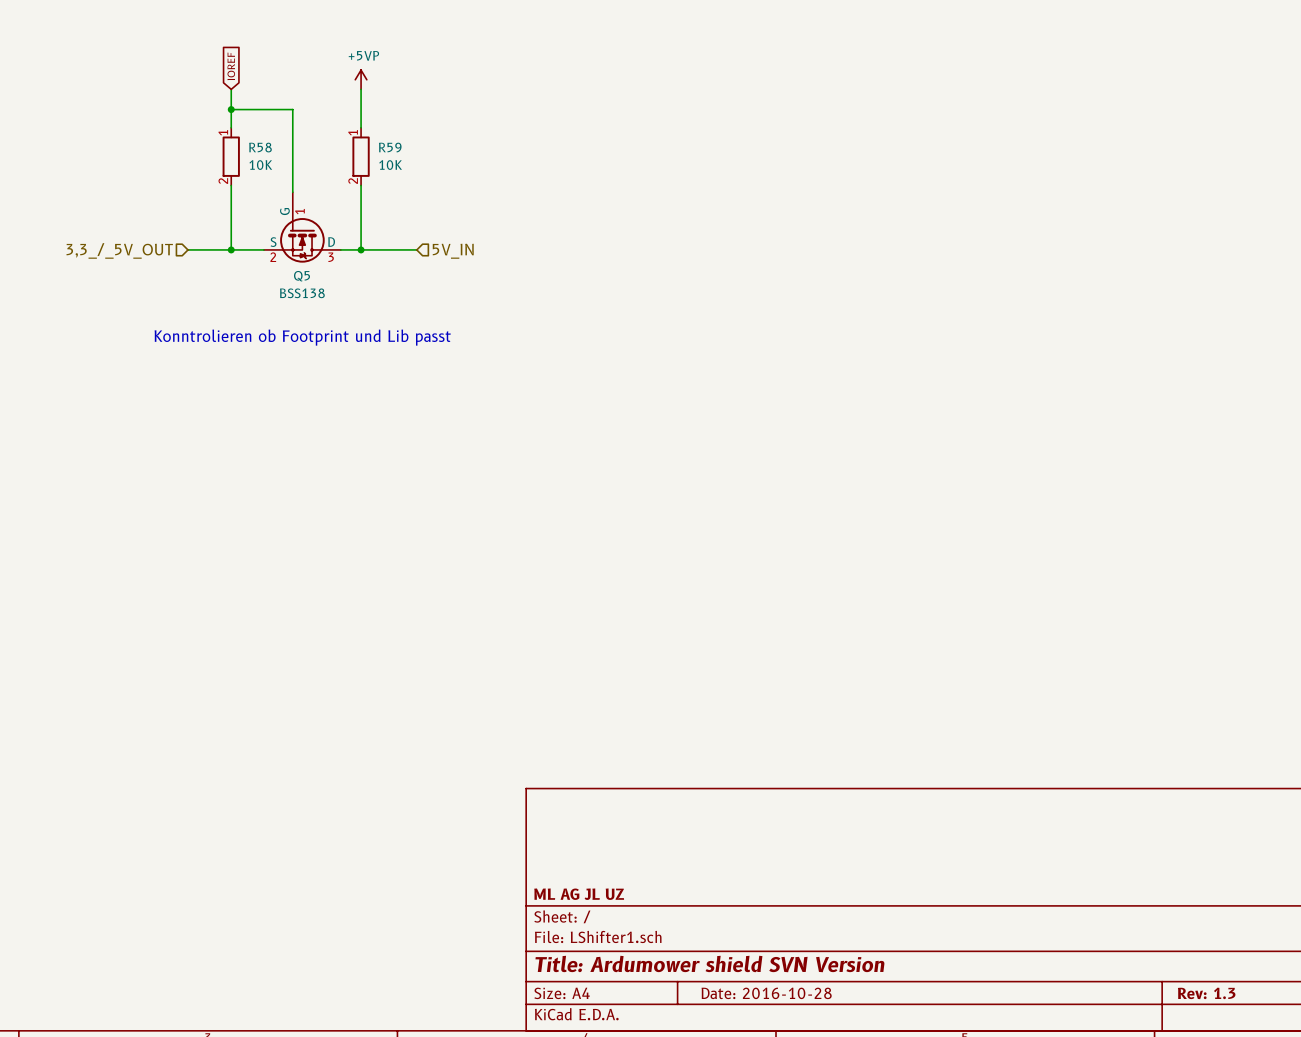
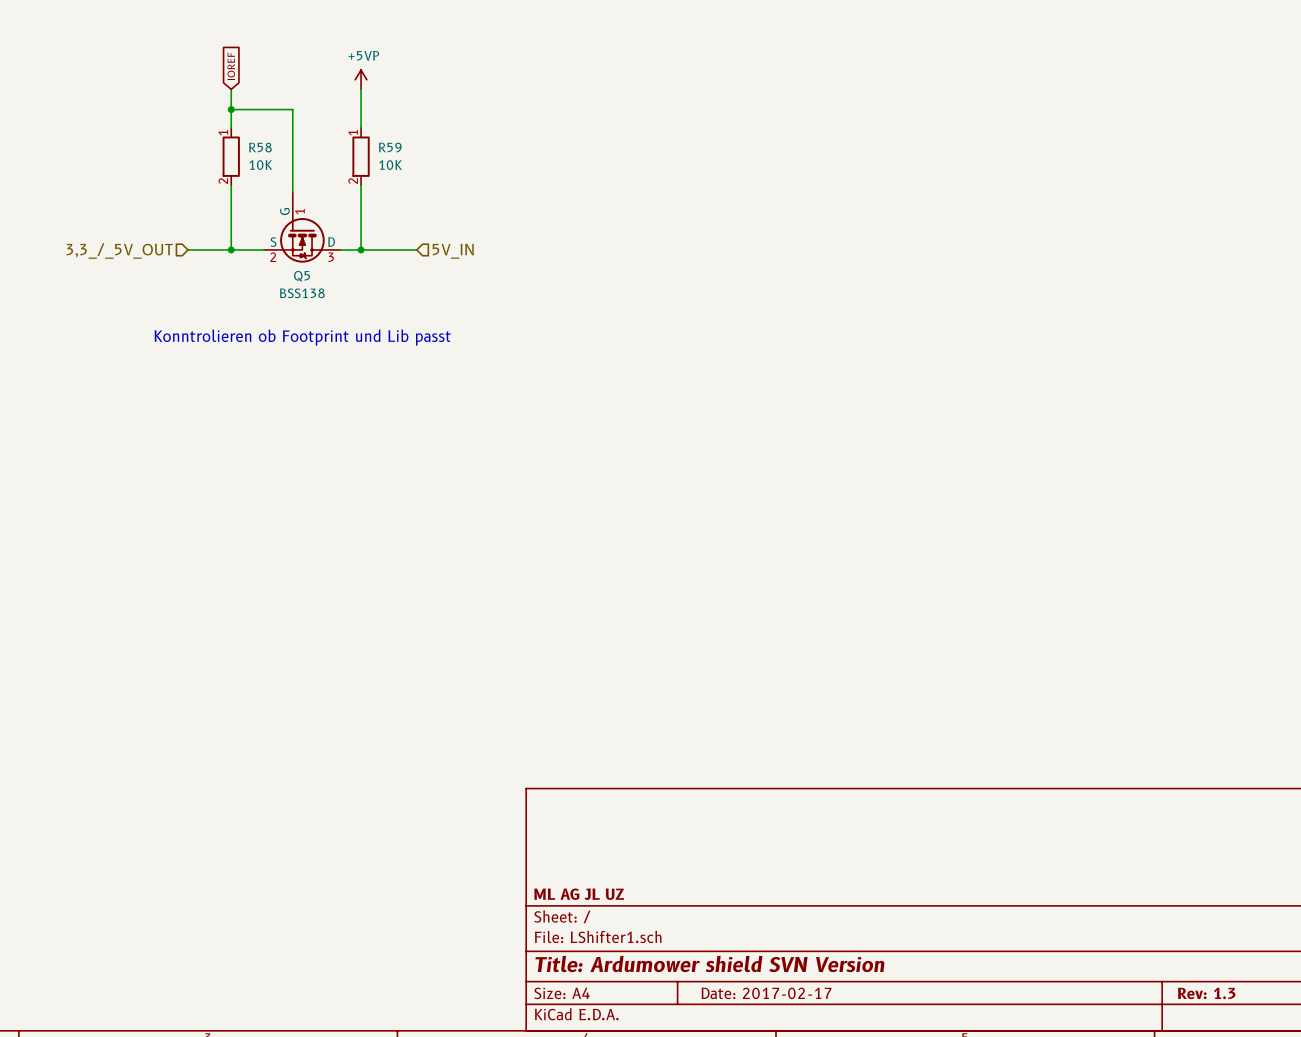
title block: Date: 2016-10-28 (766, 993) -> Date: 2017-02-17 (766, 993)

